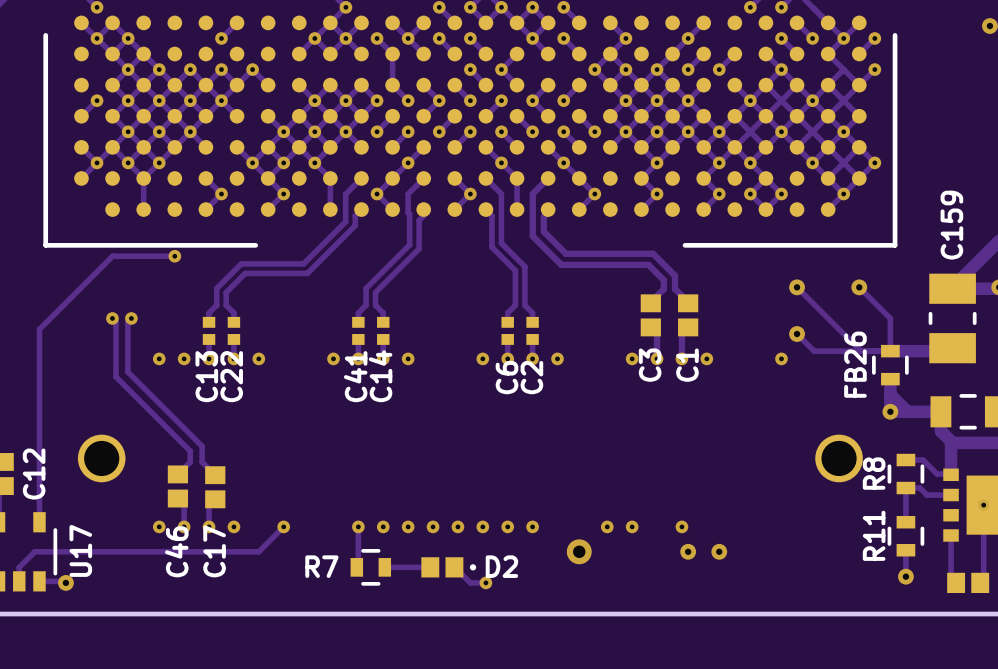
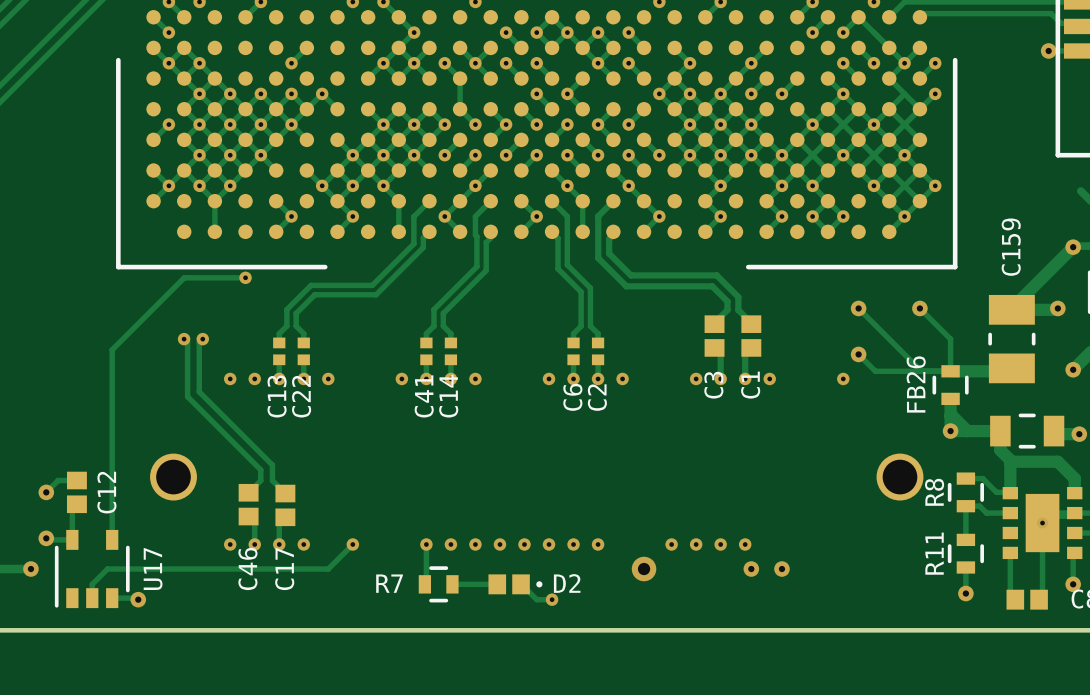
via: none -> (720, 544)

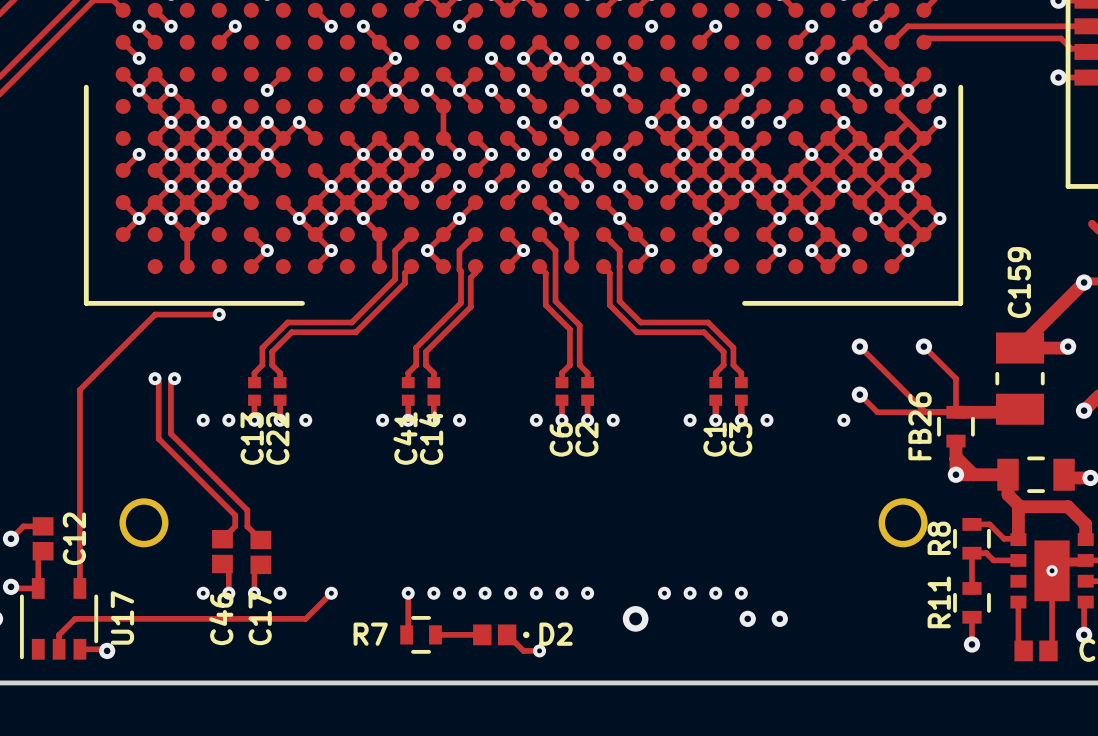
track: (613, 201) (598, 216) (598, 258) (626, 286) (712, 286) (727, 301) (727, 310) (714, 324) -> (603, 234) (619, 250) (619, 301) (640, 322) (708, 322) (733, 347) (733, 365) (741, 373) (741, 382)
track: (613, 231) (613, 234) (609, 239) (609, 253) (630, 275) (716, 275) (738, 297) (738, 310) (751, 324) -> (603, 266) (609, 273) (609, 305) (636, 332) (704, 332) (723, 351) (723, 365) (715, 373) (715, 382)
C3 footprint: [704, 315, 725, 357] -> [734, 377, 748, 406]
C1 footprint: [741, 315, 762, 357] -> [709, 377, 723, 406]

